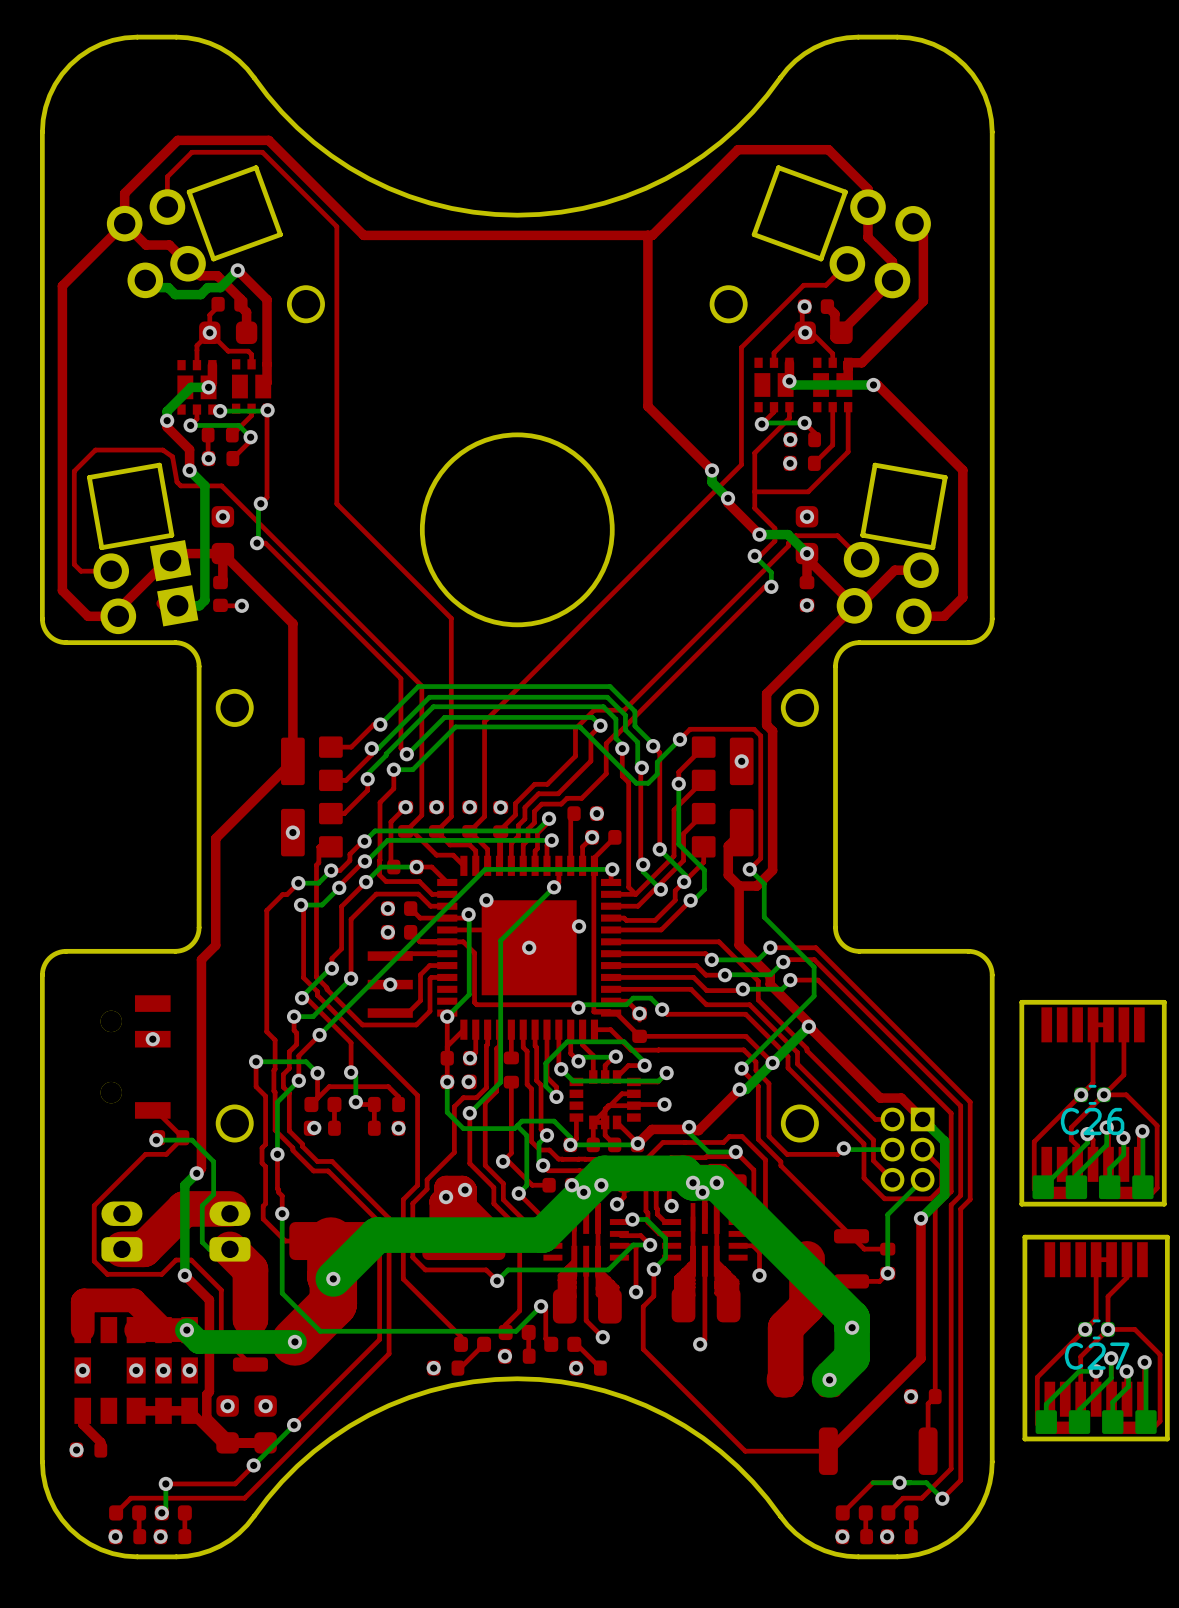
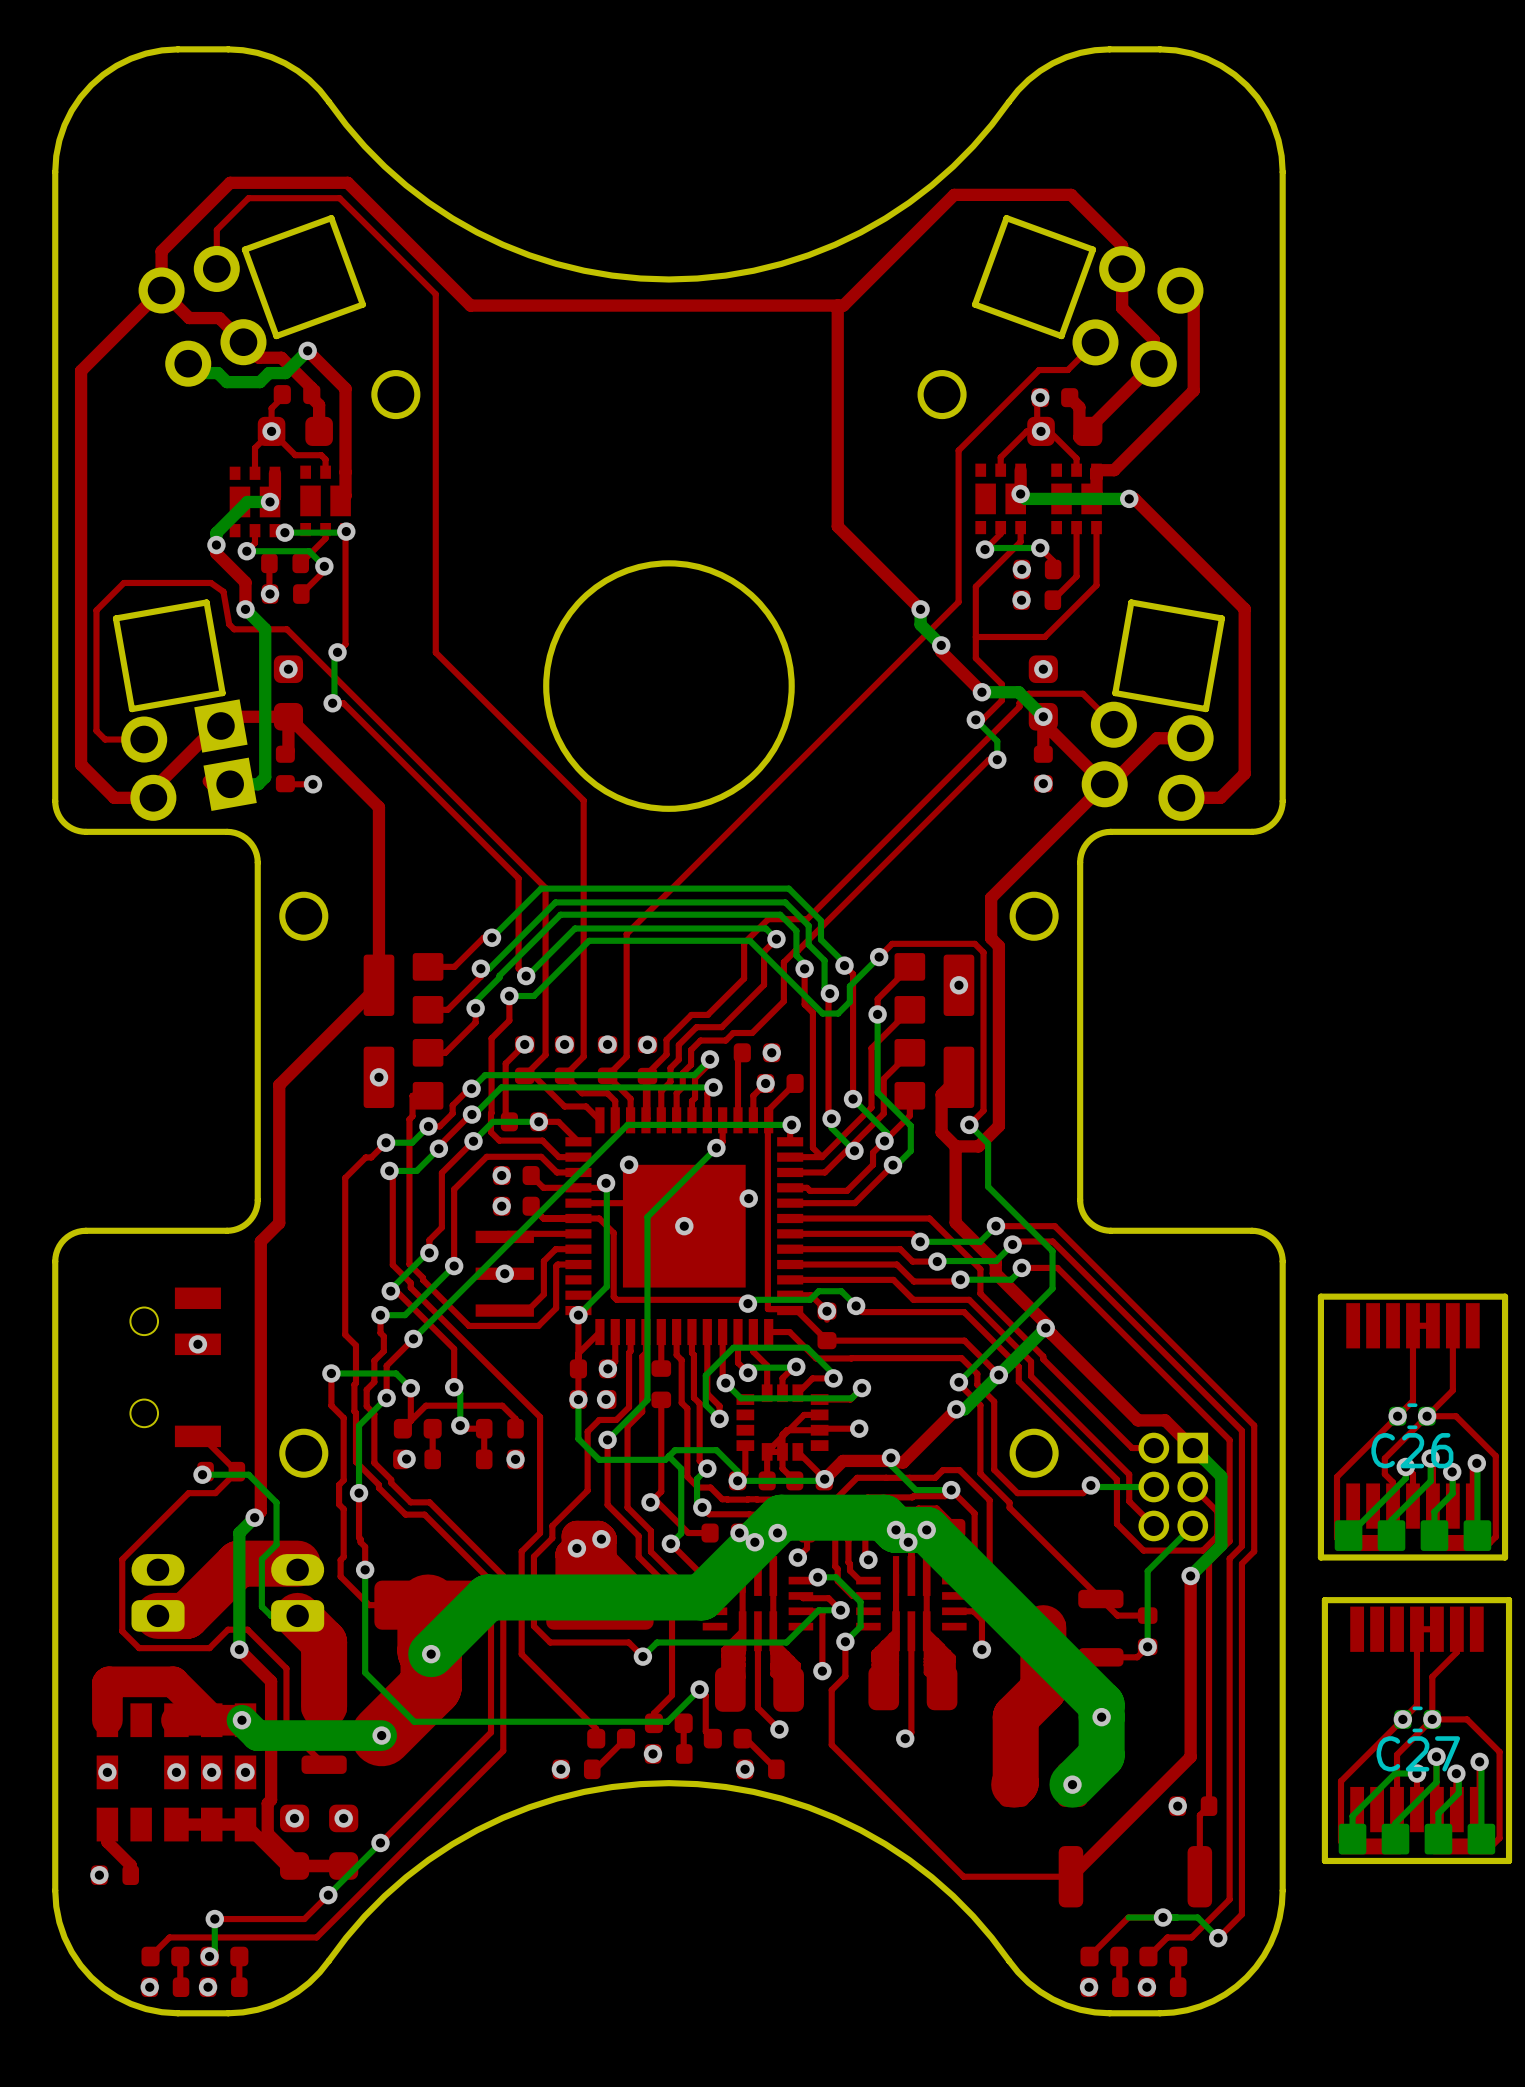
part footprint: [100, 995, 171, 1119] -> [130, 1287, 221, 1448]

